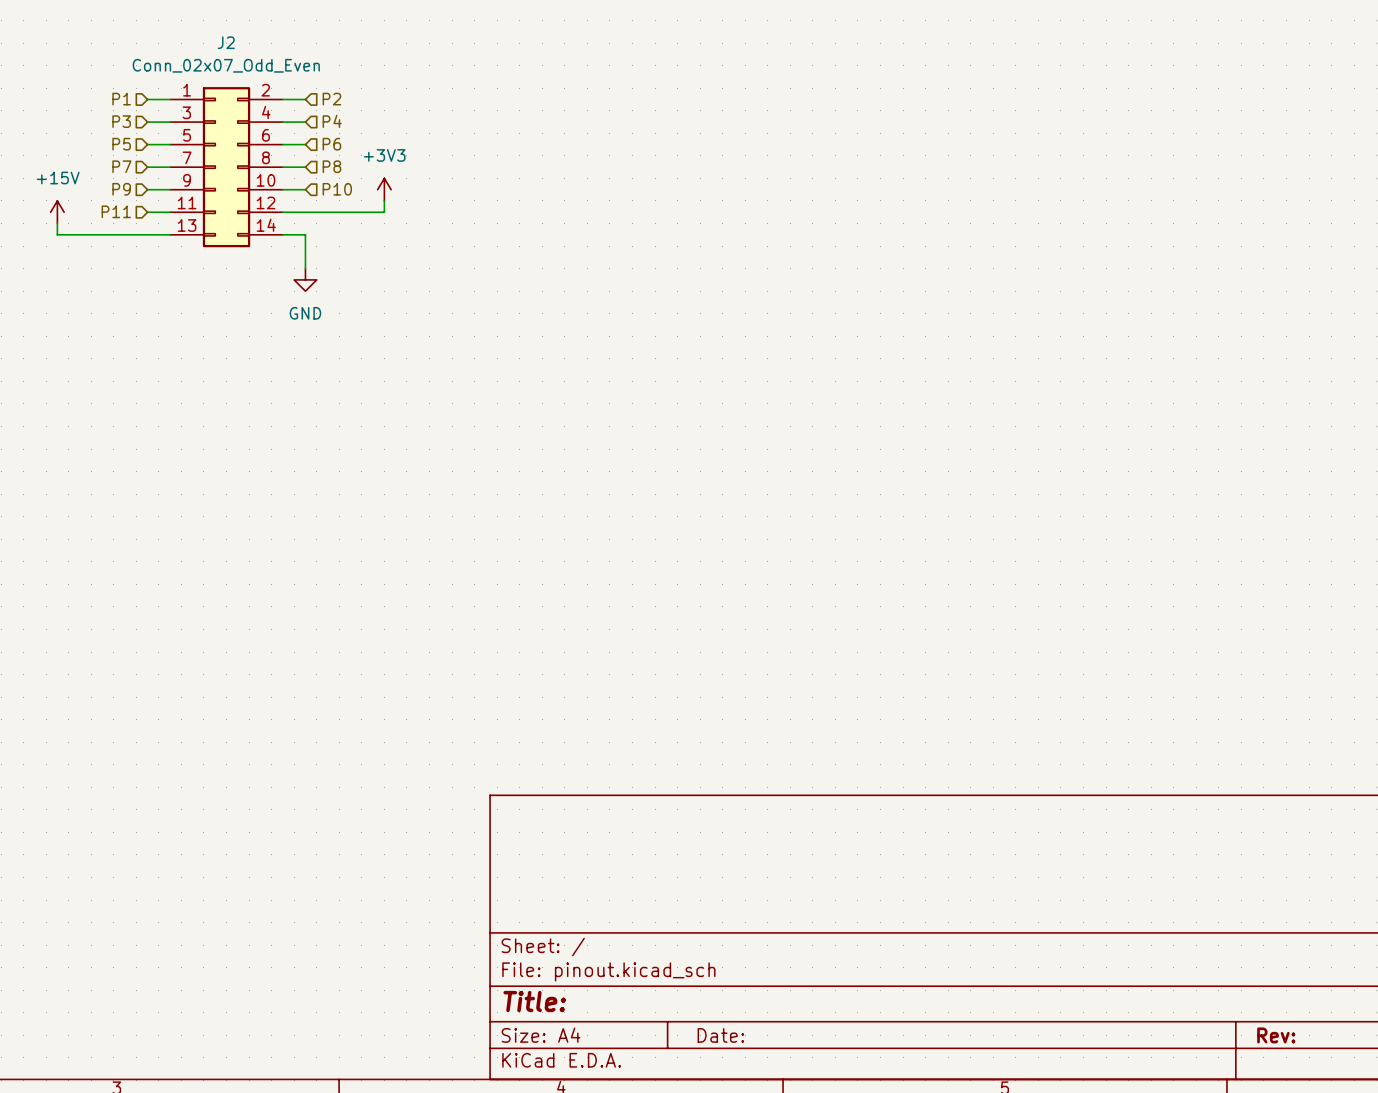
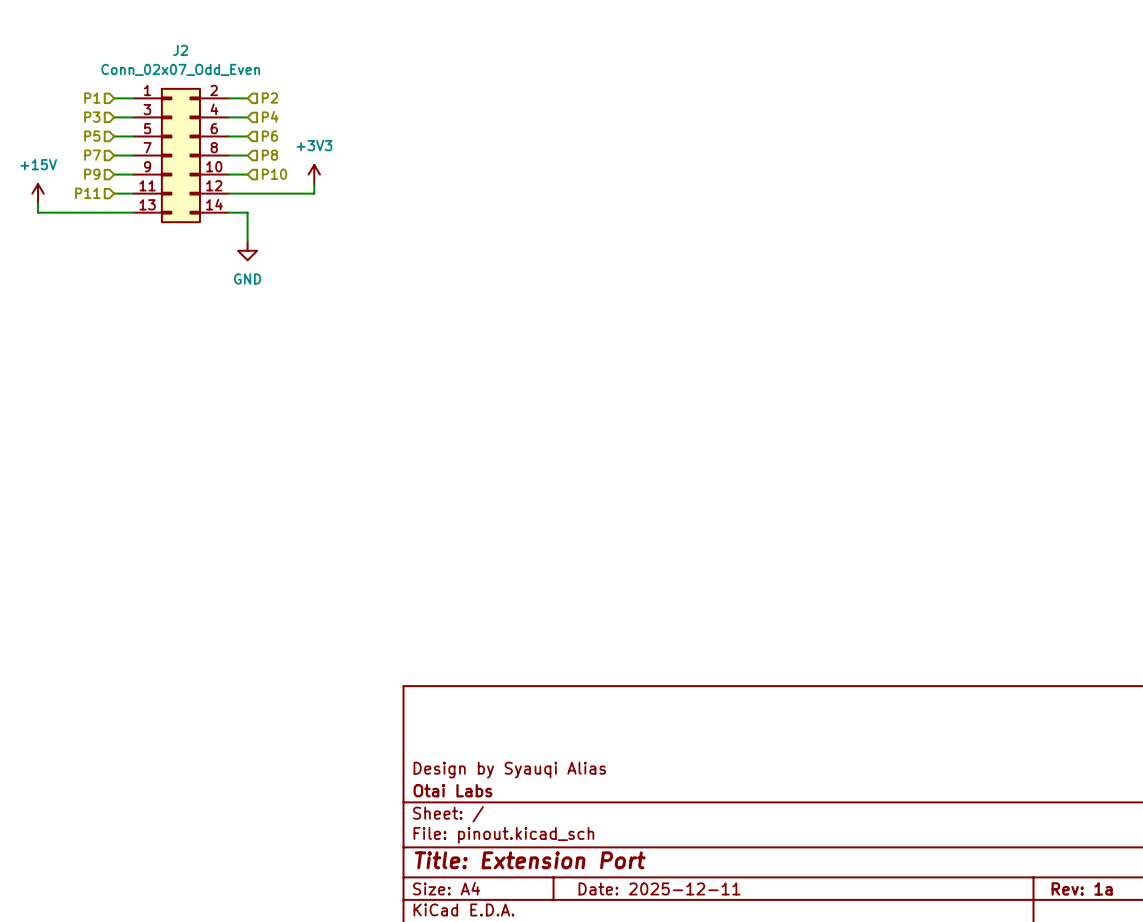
title block: none -> Design by Syauqi Alias (509, 770)
title block: none -> Otai Labs (452, 790)
title block: Title: (534, 1001) -> Title: Extension Port (530, 860)
title block: Date: (720, 1035) -> Date: 2025-12-11 (659, 888)
title block: Rev: (1276, 1035) -> Rev: 1a (1082, 888)

